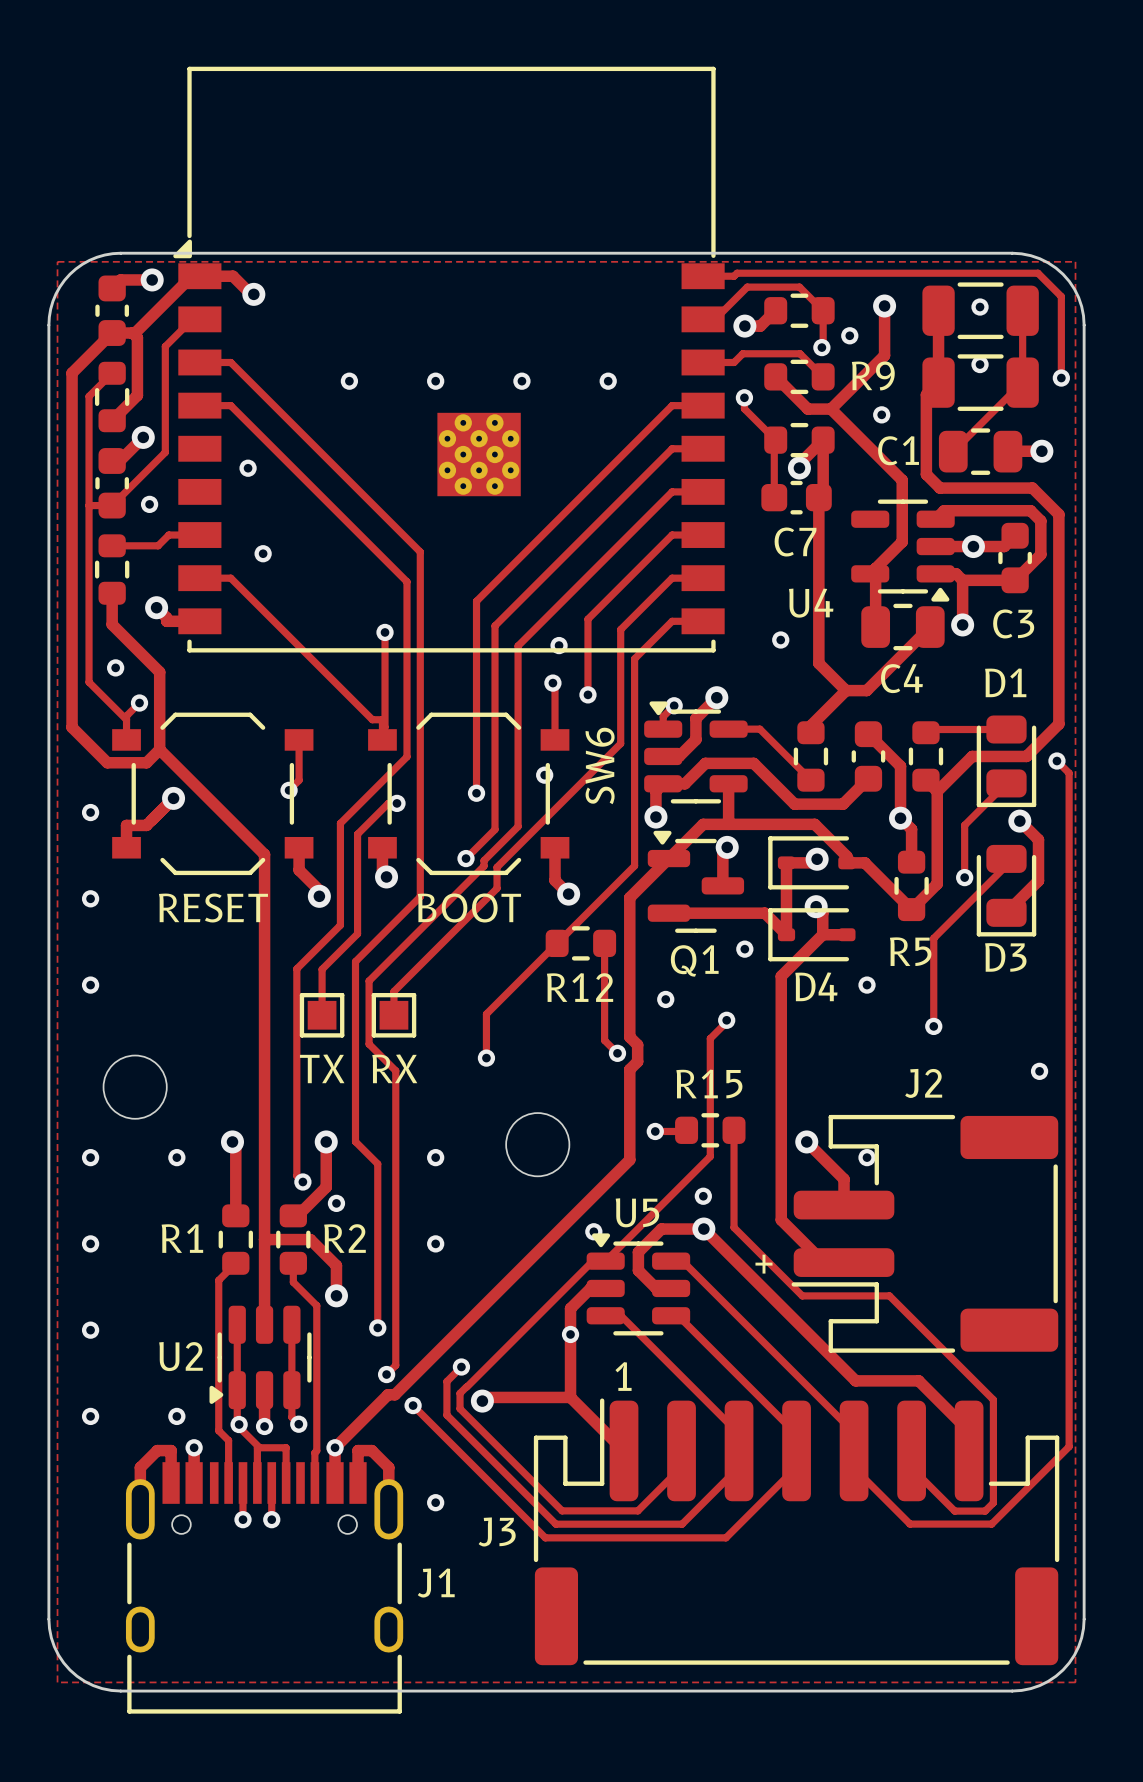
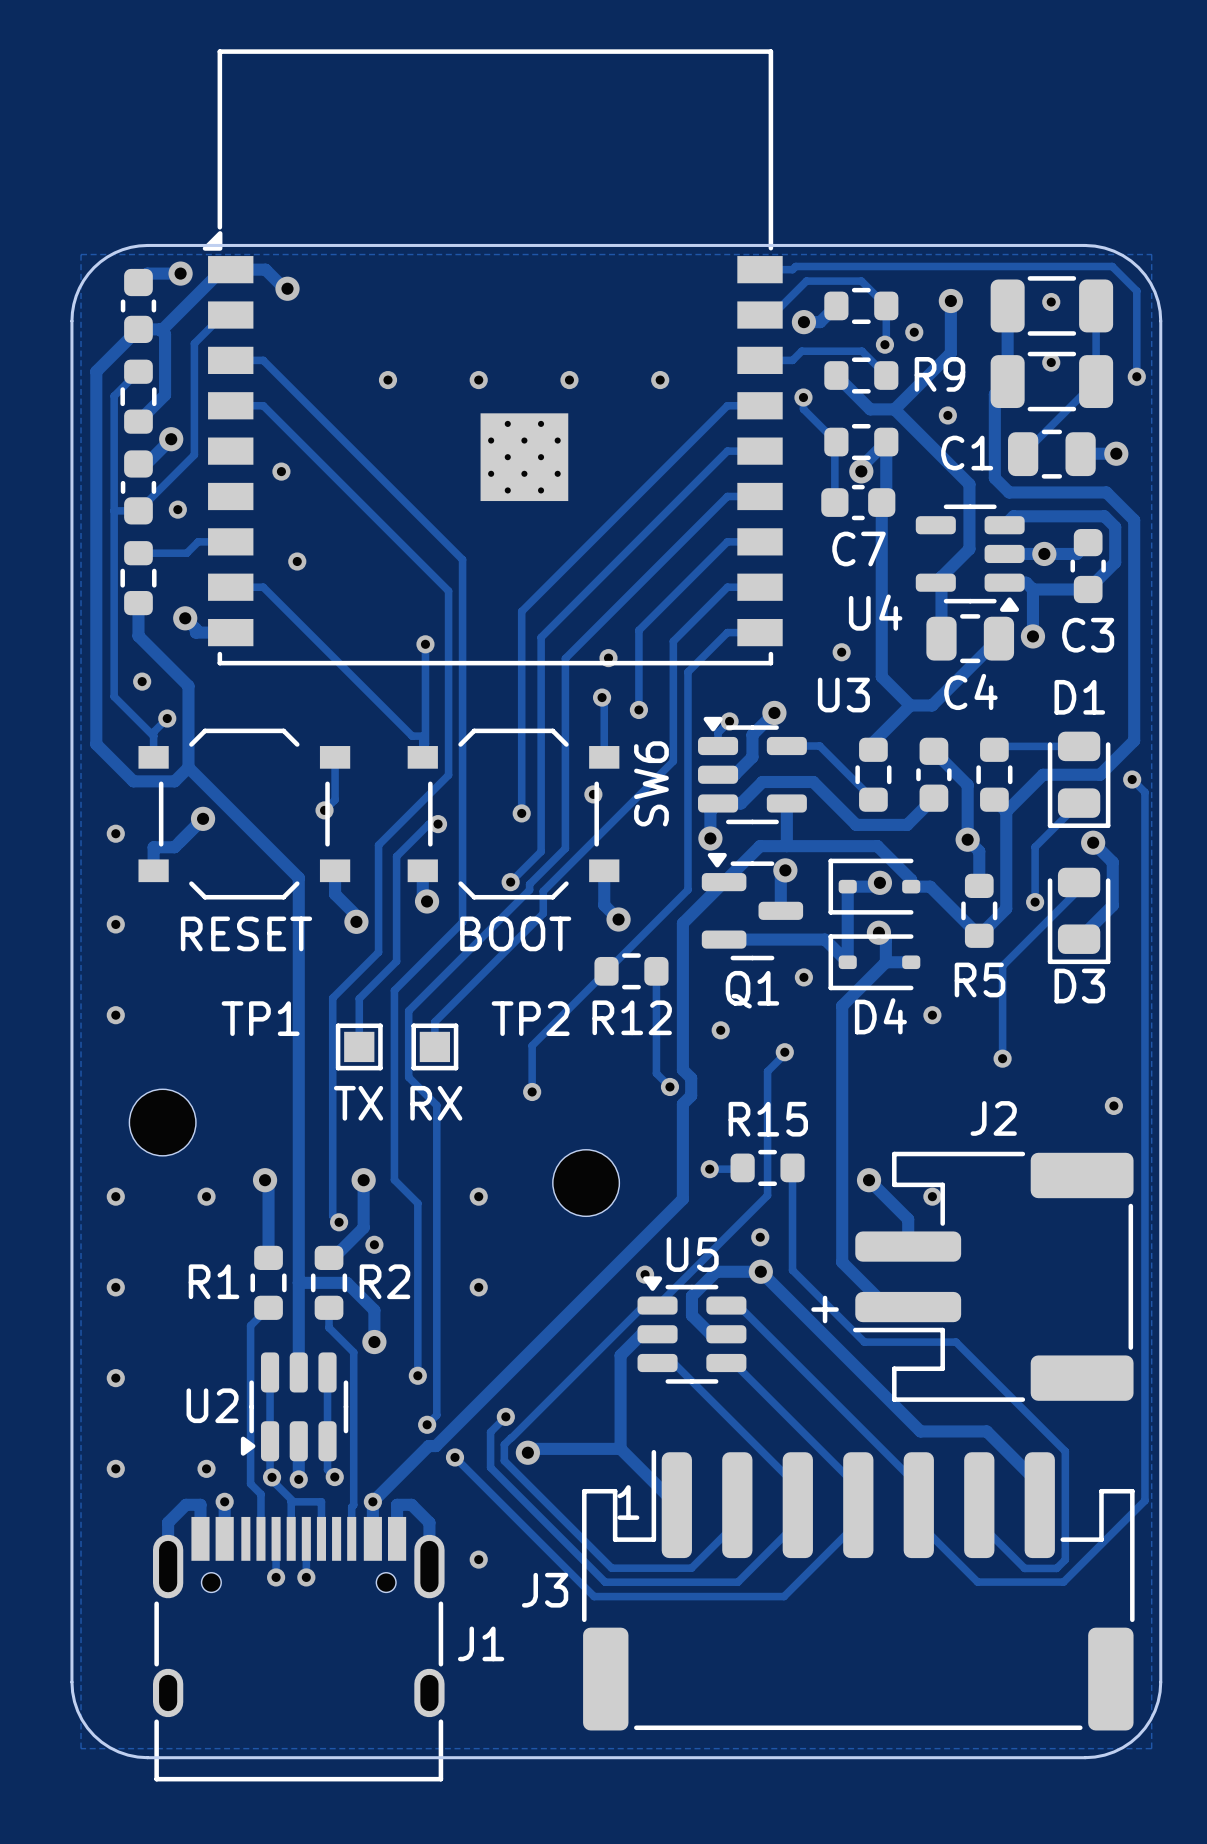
U3 name: none -> U3 (843, 695)
TP1 name: none -> TP1 (260, 1018)
TP2 name: none -> TP2 (530, 1018)
via: (570, 1334) -> none
text position: 1 (623, 1376) -> 1 (628, 1502)

